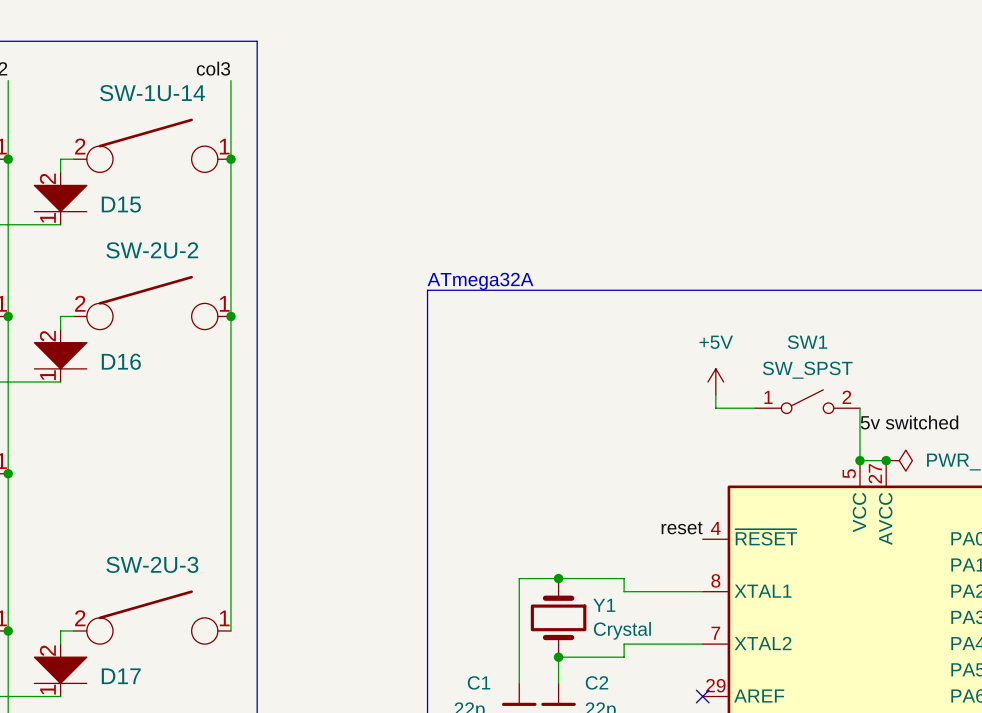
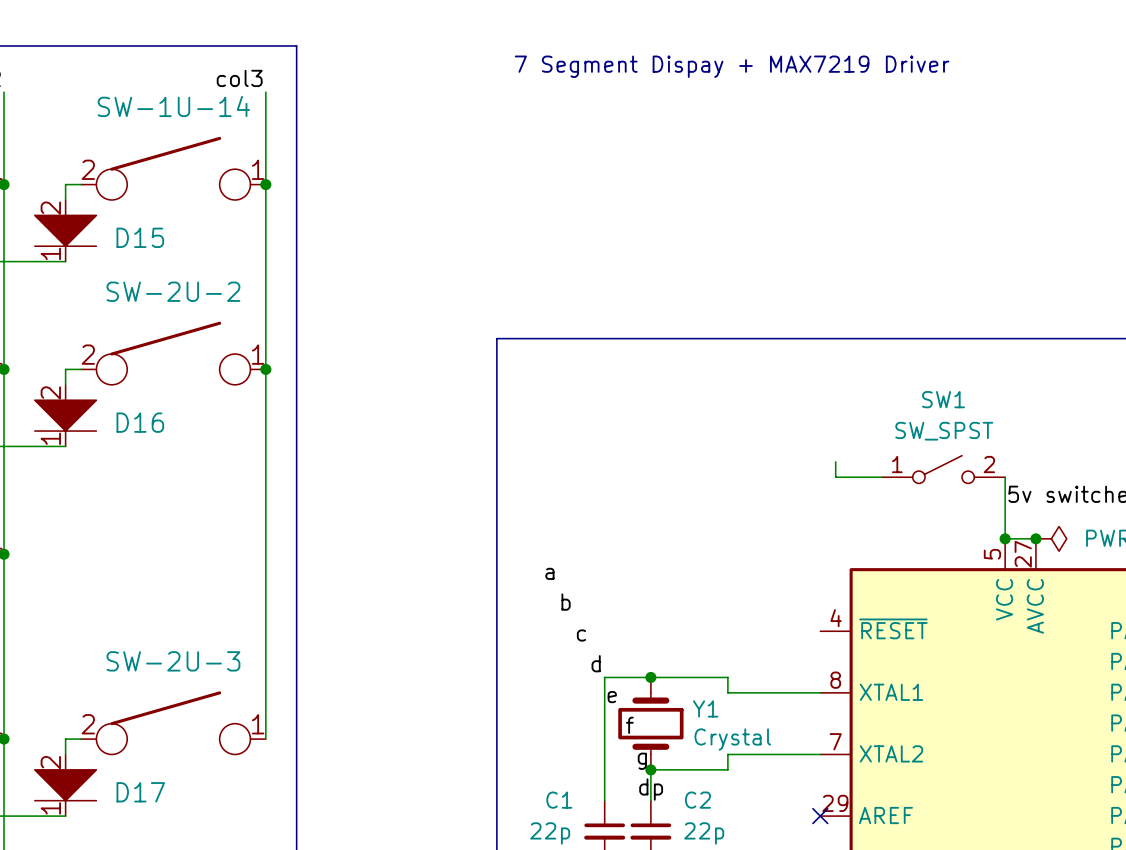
text: none -> 7 Segment Dispay + MAX7219 Driver (732, 66)
text: ATmega32A (480, 281) -> none
power symbol: +5V (715, 382) -> none
label: none -> a (549, 573)
label: none -> b (566, 602)
label: reset (682, 528) -> none
label: none -> c (581, 635)
label: none -> d (596, 663)
label: none -> e (612, 697)
label: none -> f (629, 725)
label: none -> g (642, 761)
label: none -> dp (651, 789)

